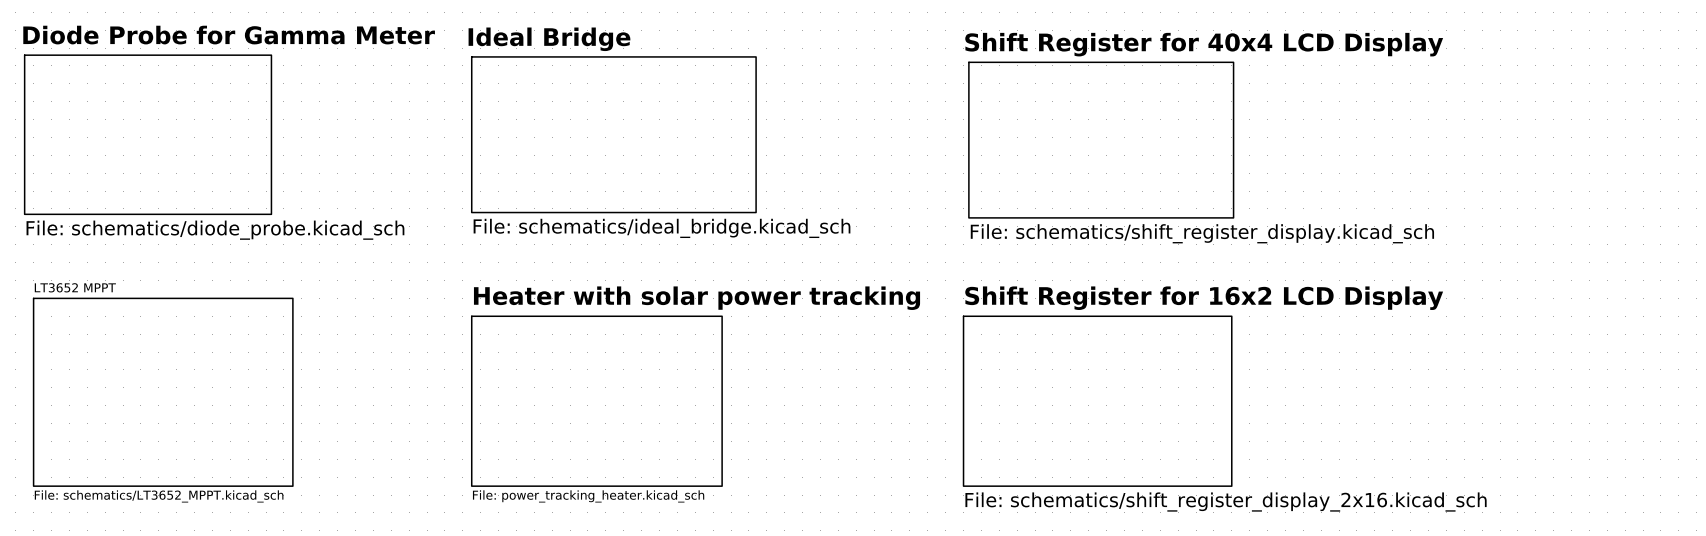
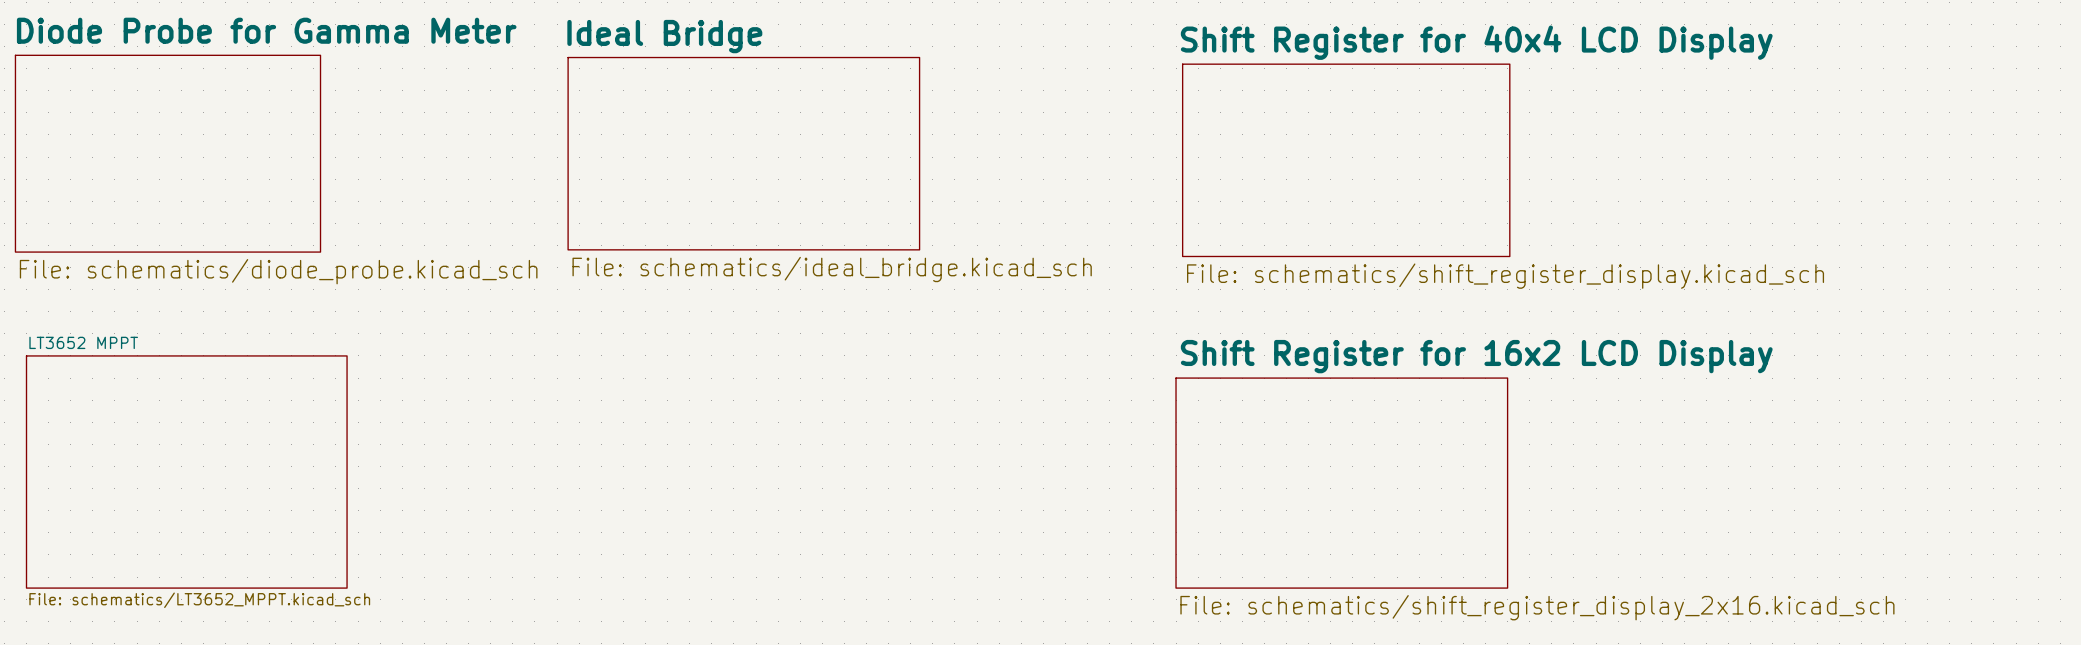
sheet Heater with solar power tracking: File: power_tracking_heater.kicad_sch (596, 401) -> none

